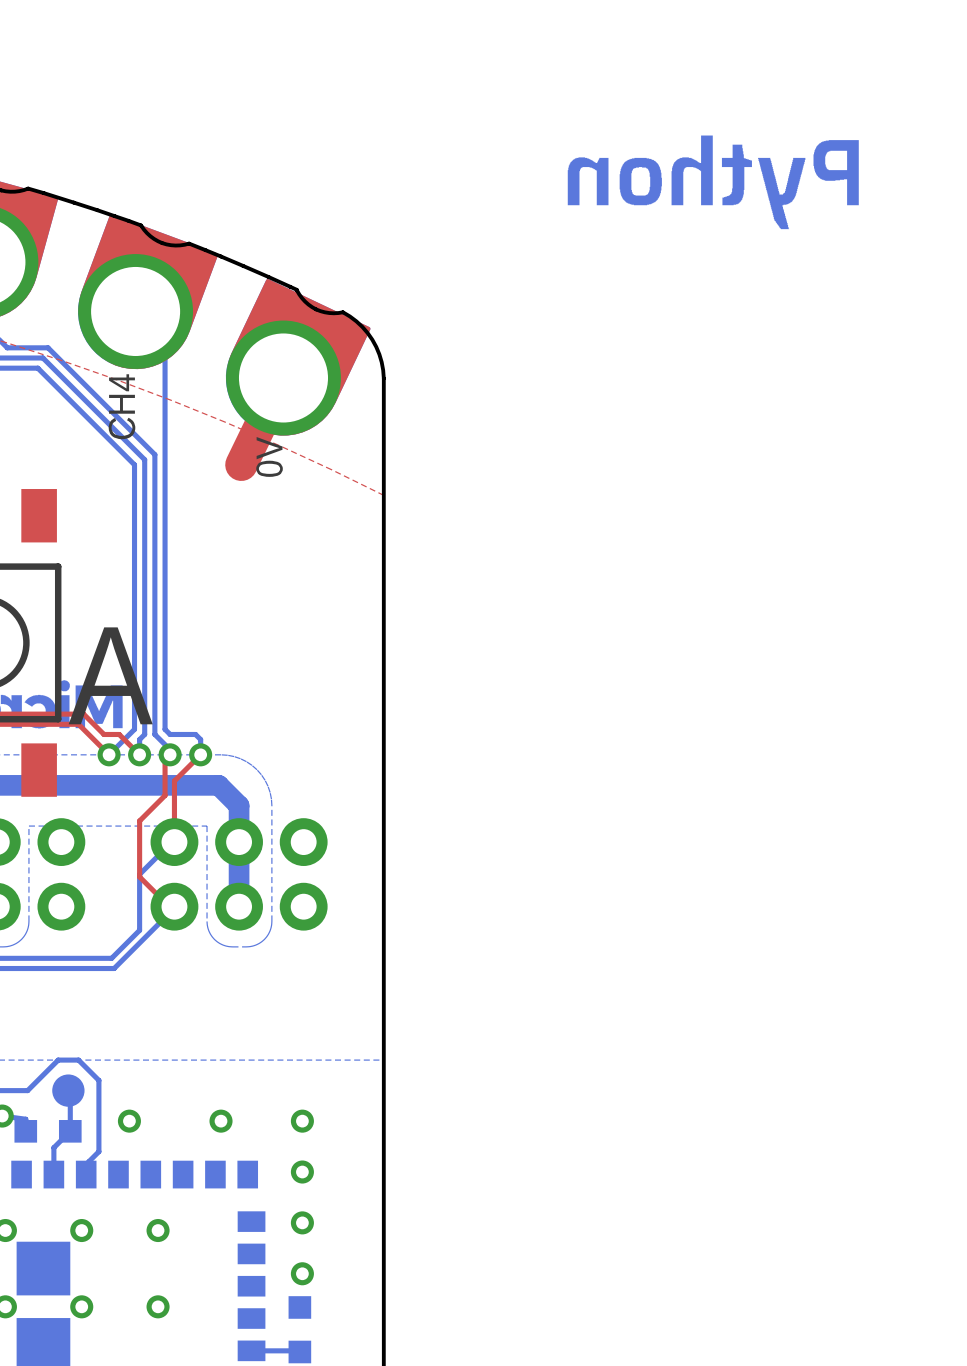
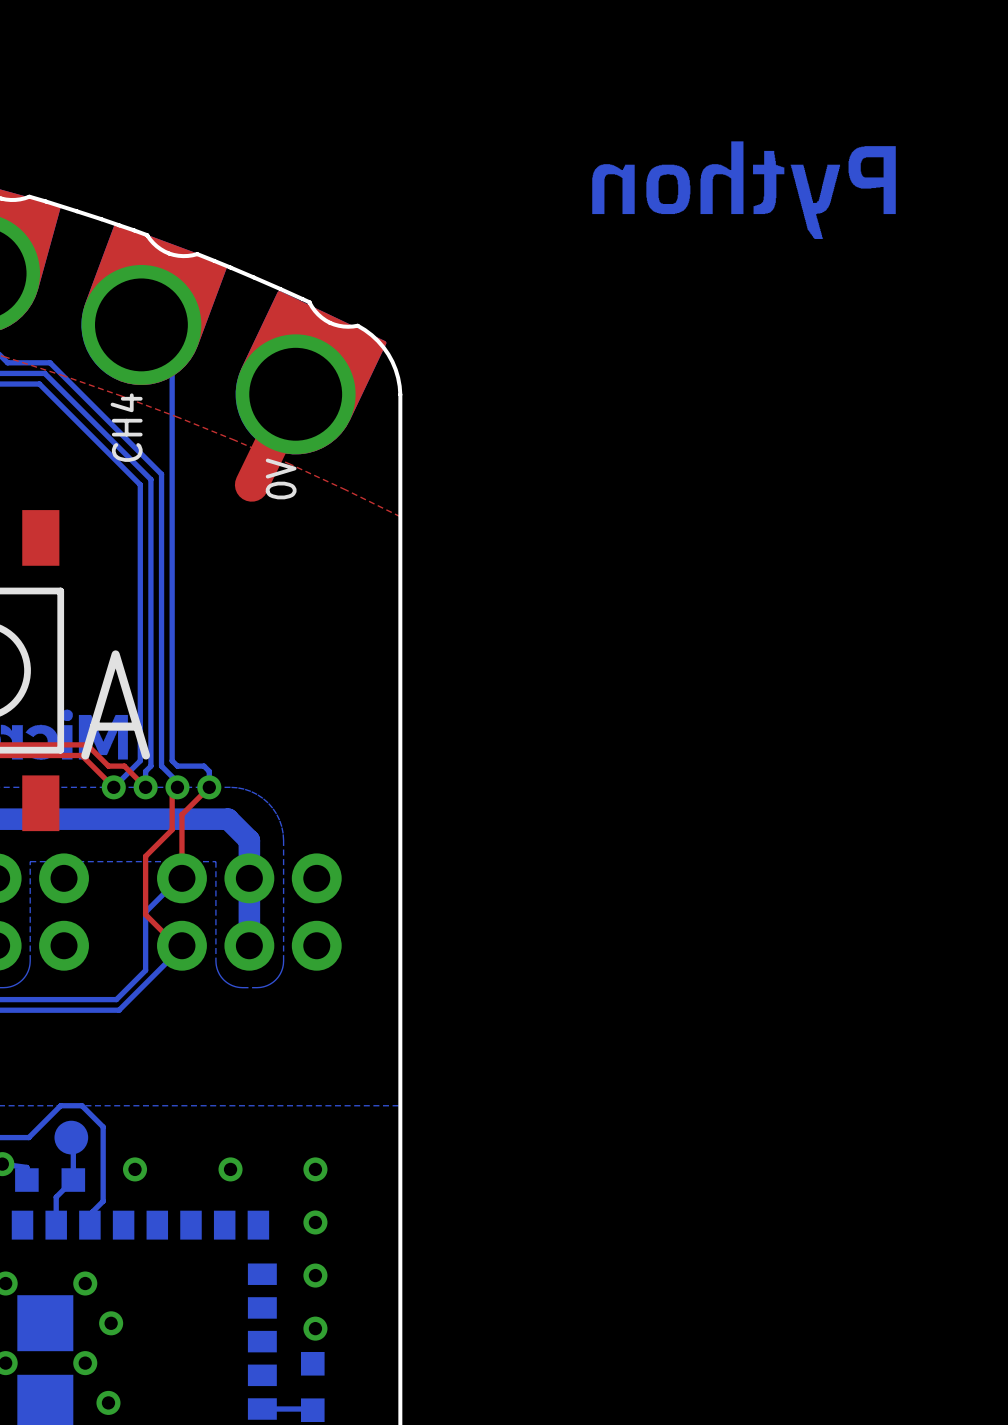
via: (158, 1230) -> none
via: none -> (111, 1323)
via: (158, 1306) -> none
via: none -> (108, 1402)

